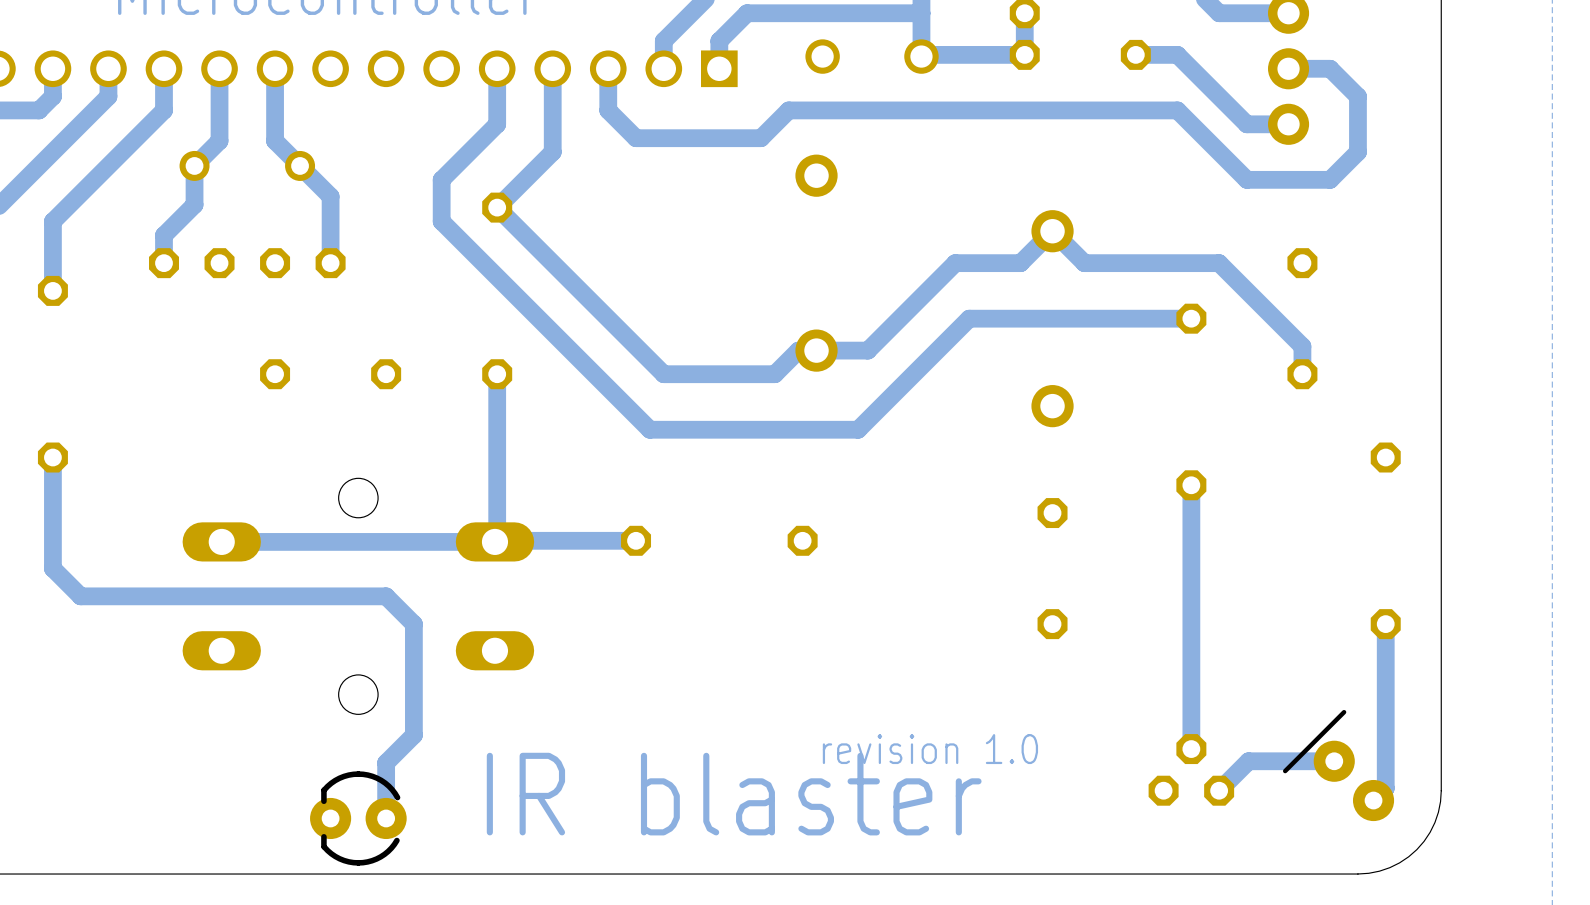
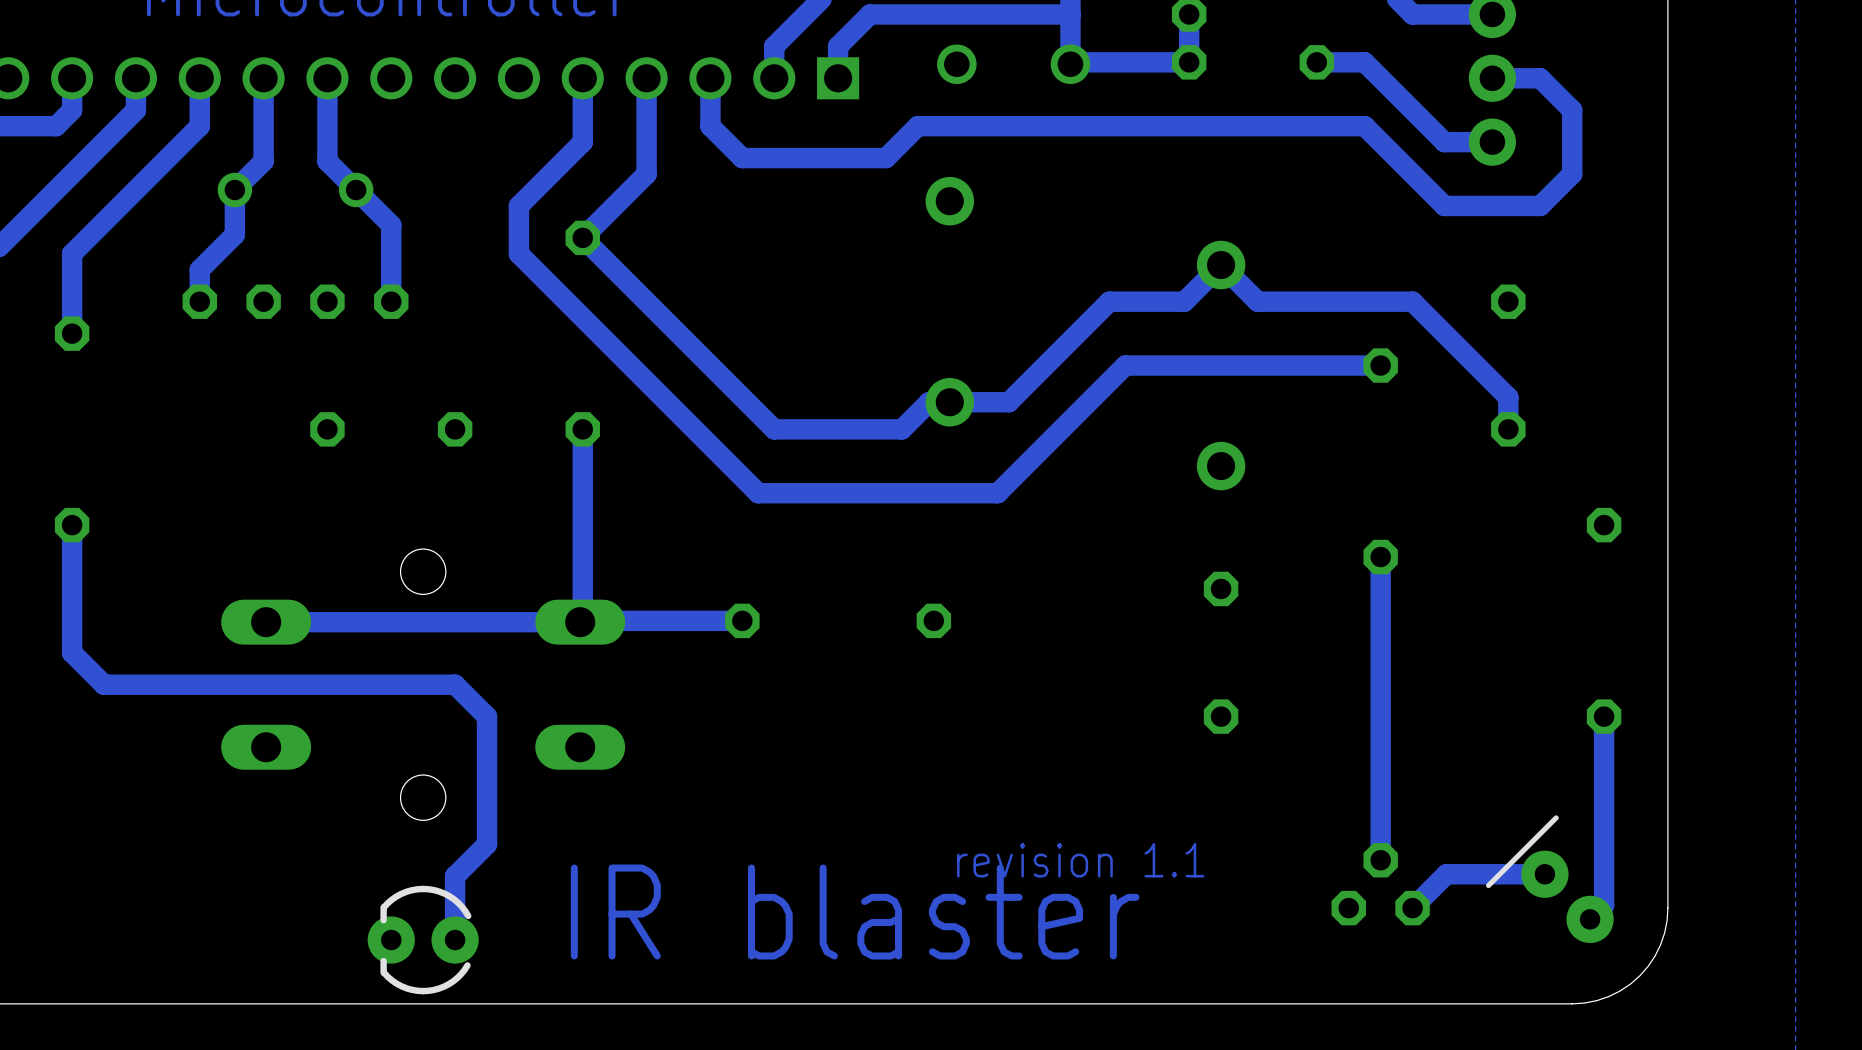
text: revision 1.0 (930, 749) -> revision 1.1 (1080, 860)

